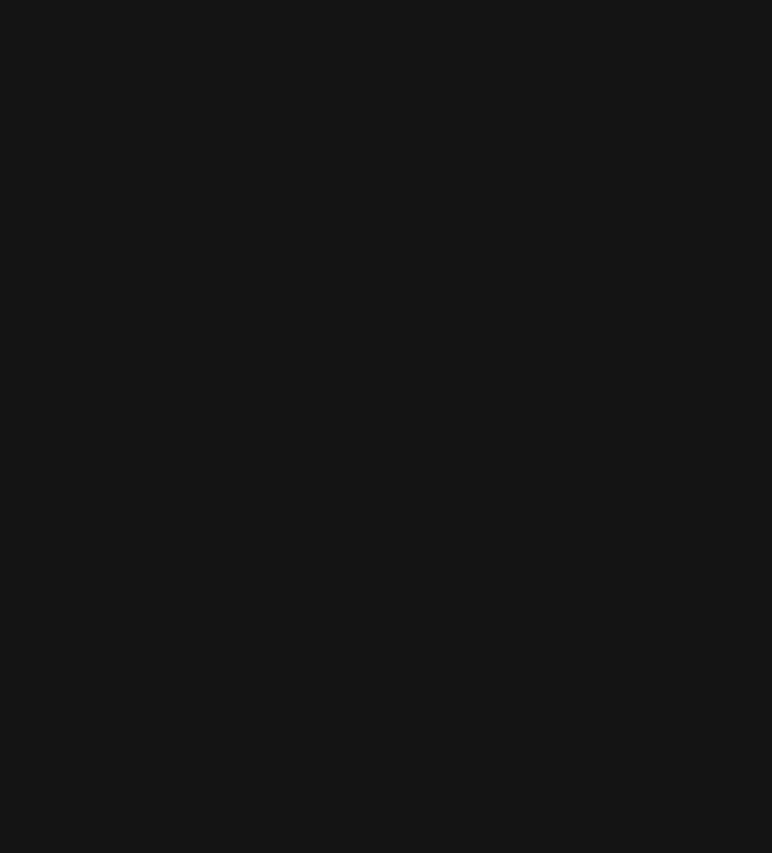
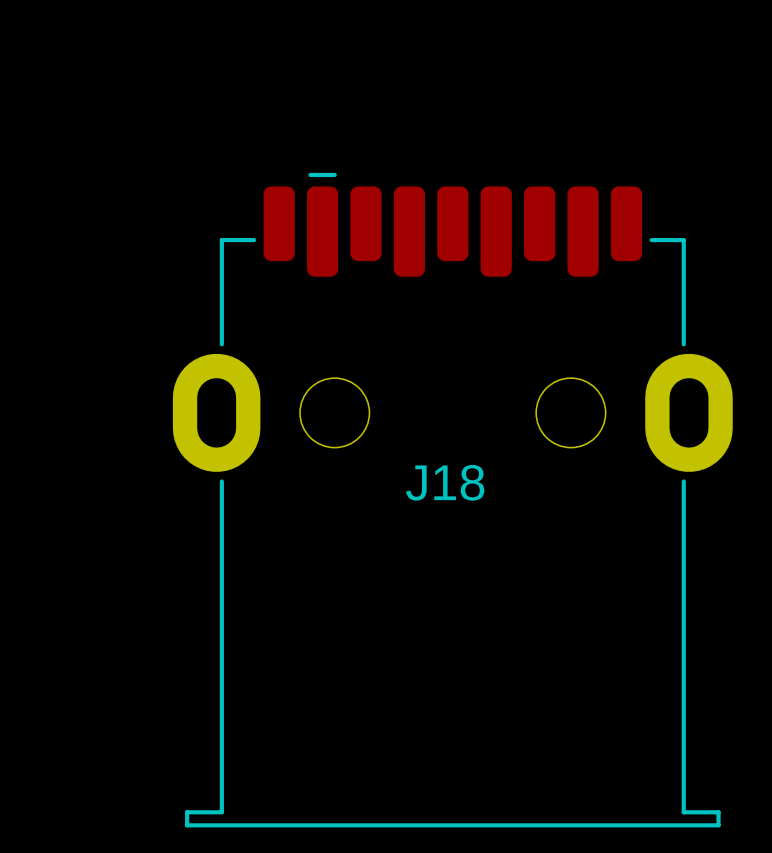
J18: none -> (452, 500)

